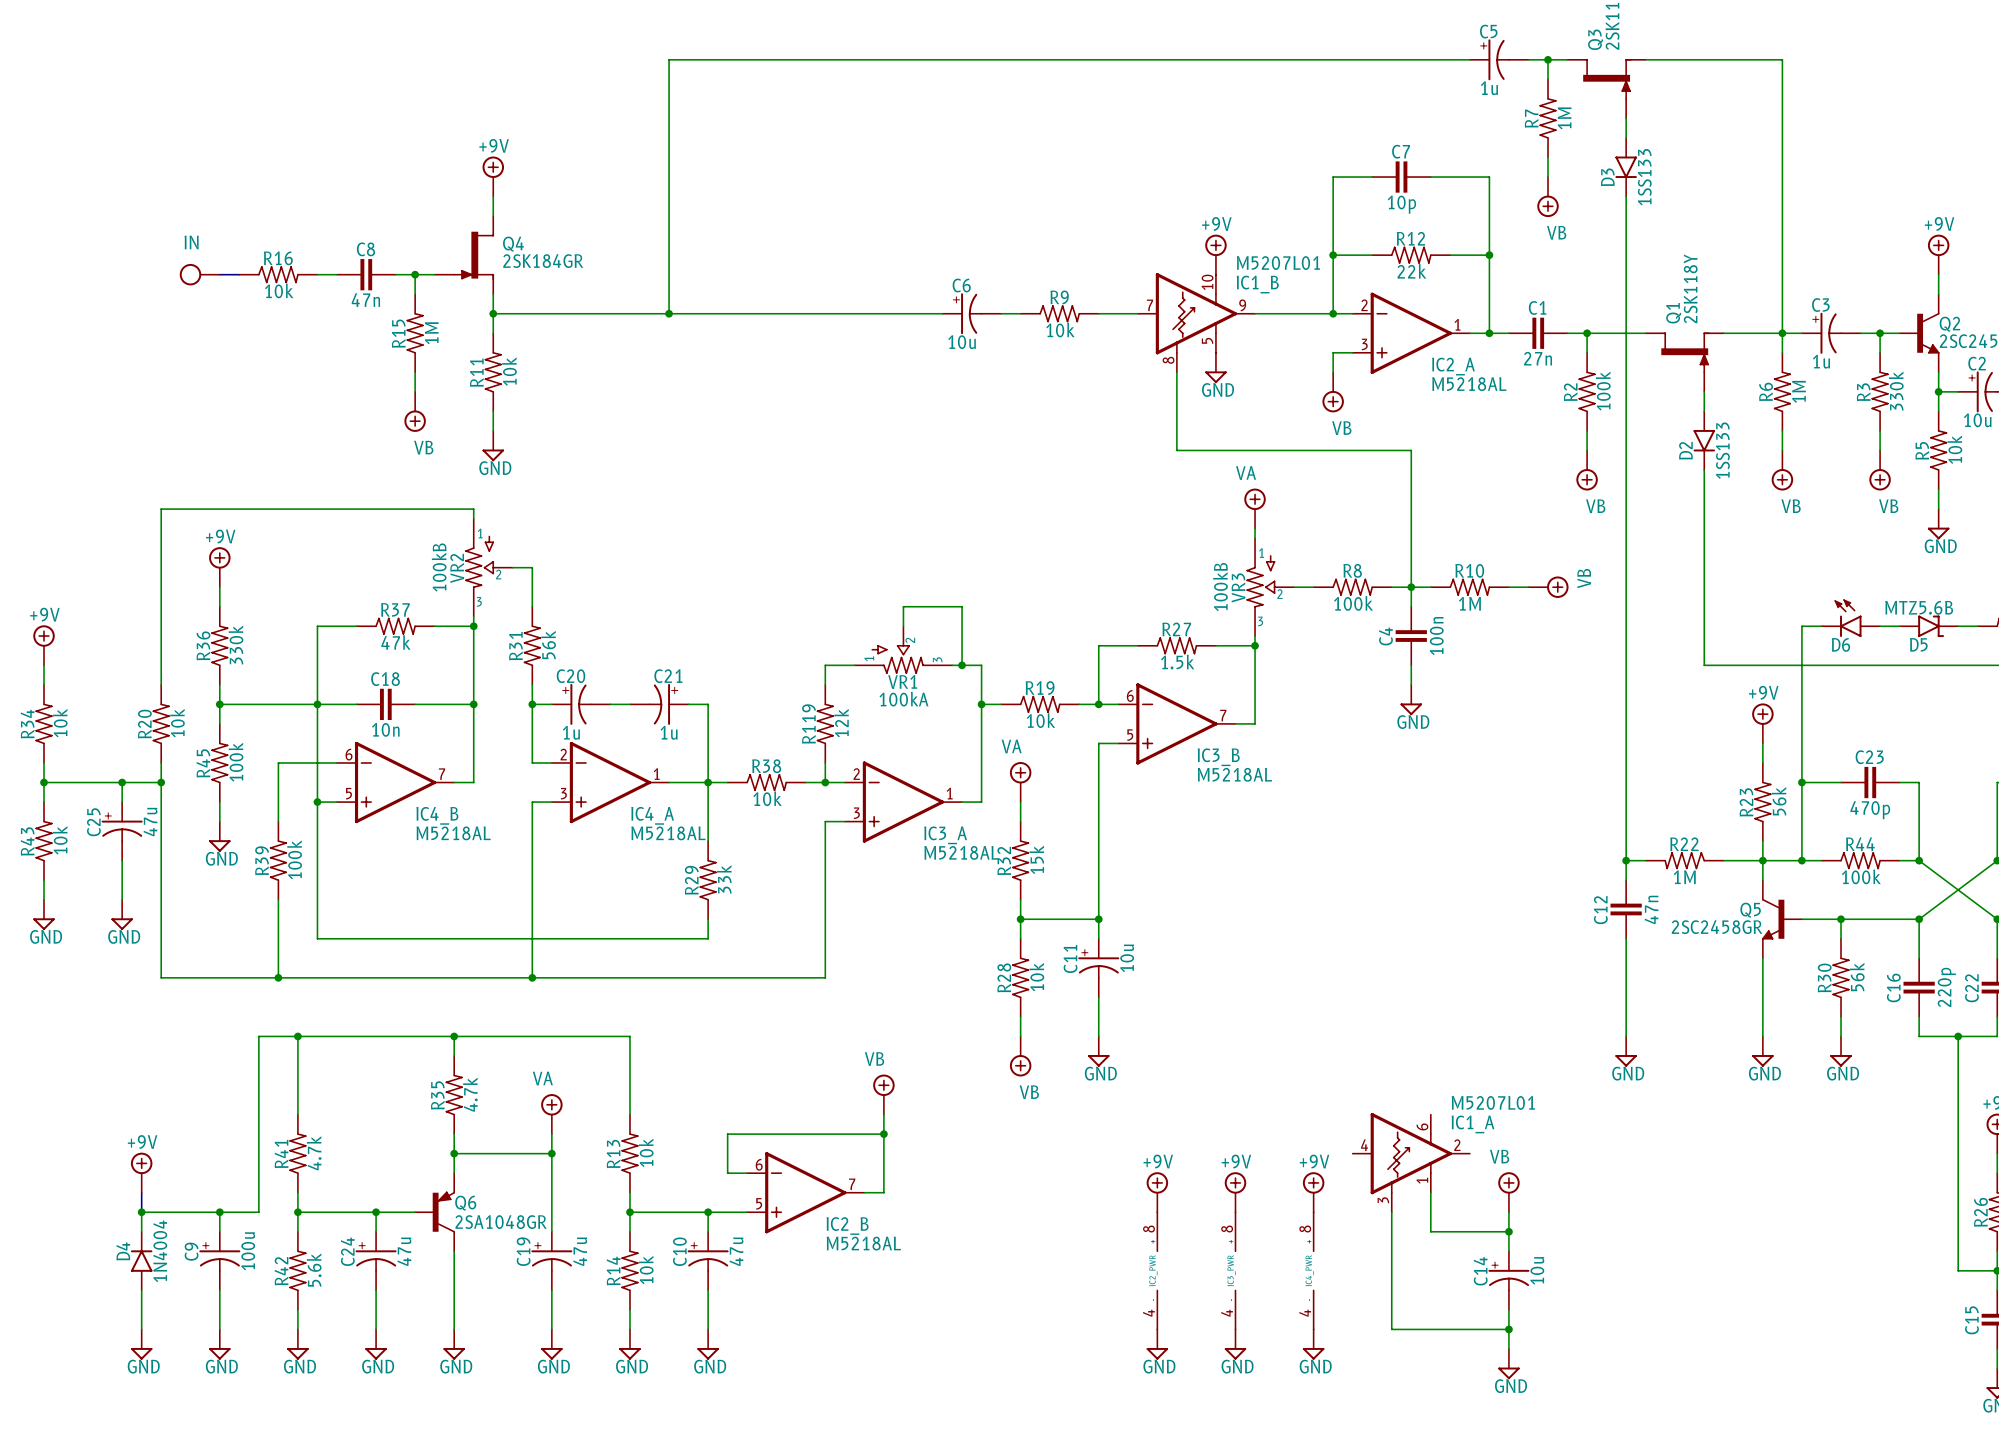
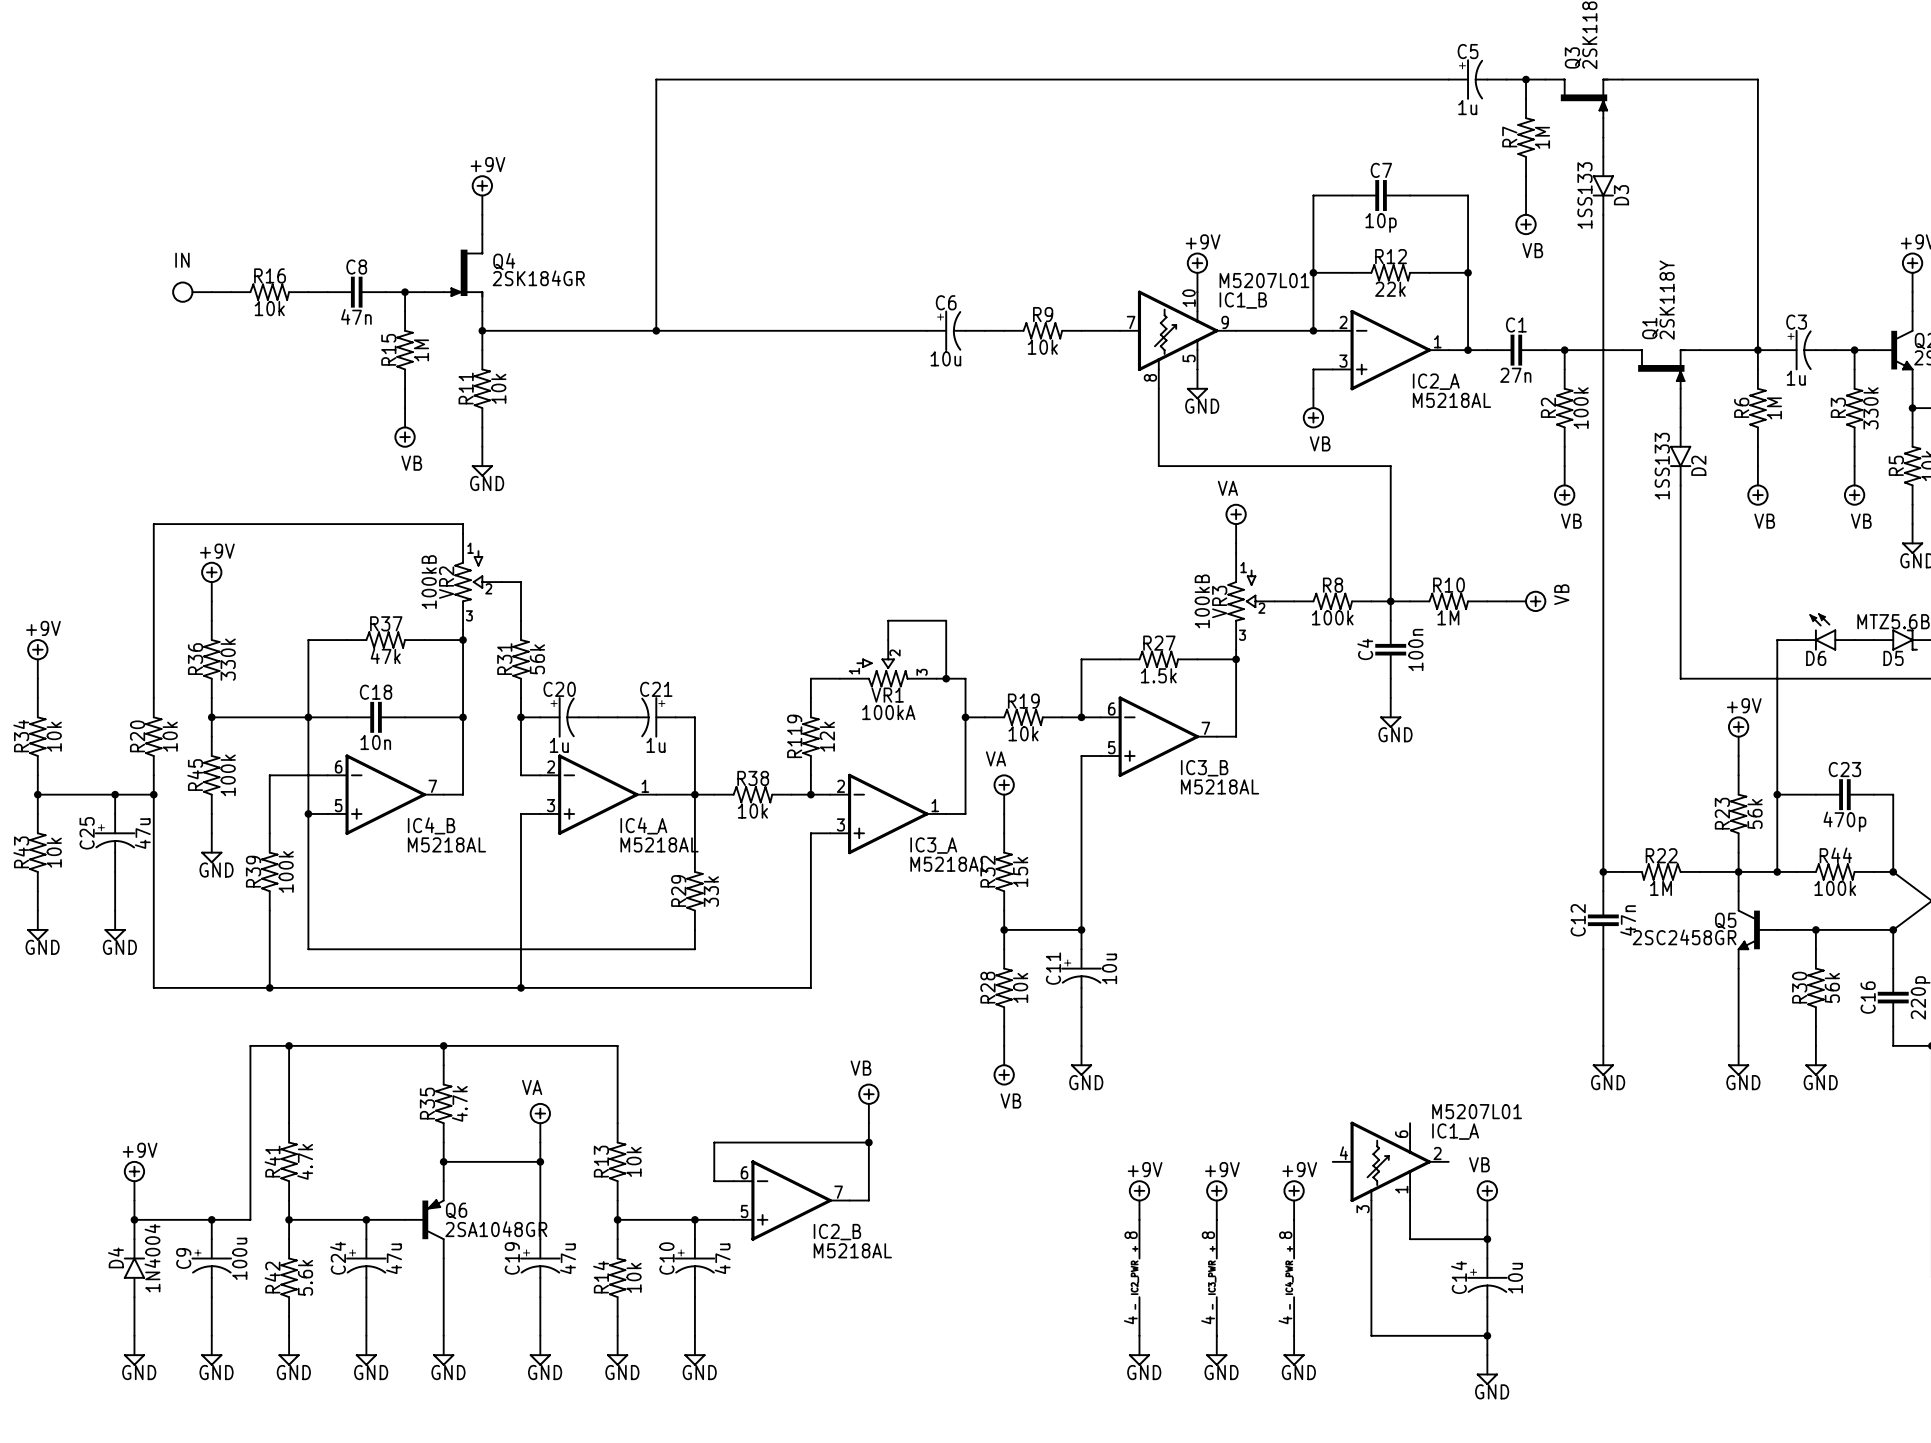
D3 name position: D3 (1607, 177) -> D3 (1621, 195)
D3 value position: 1SS133 (1644, 177) -> 1SS133 (1584, 195)
D2 name position: D2 (1685, 450) -> D2 (1698, 465)
D2 value position: 1SS133 (1722, 450) -> 1SS133 (1662, 466)

